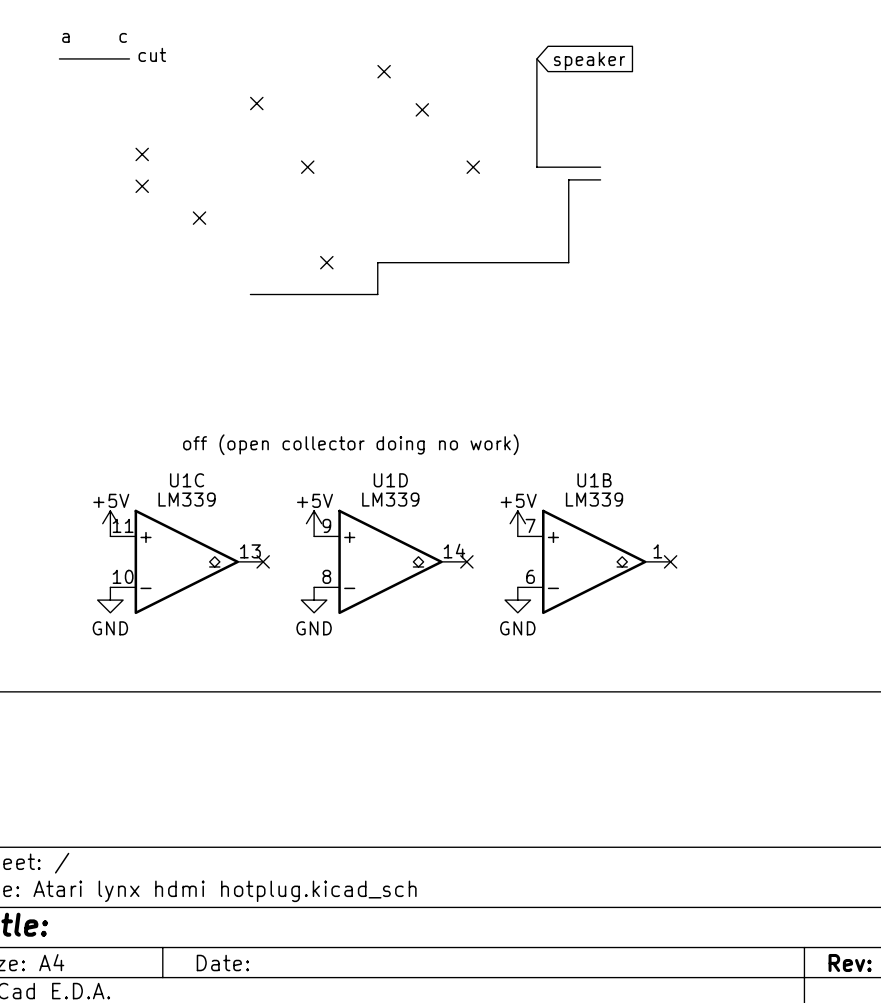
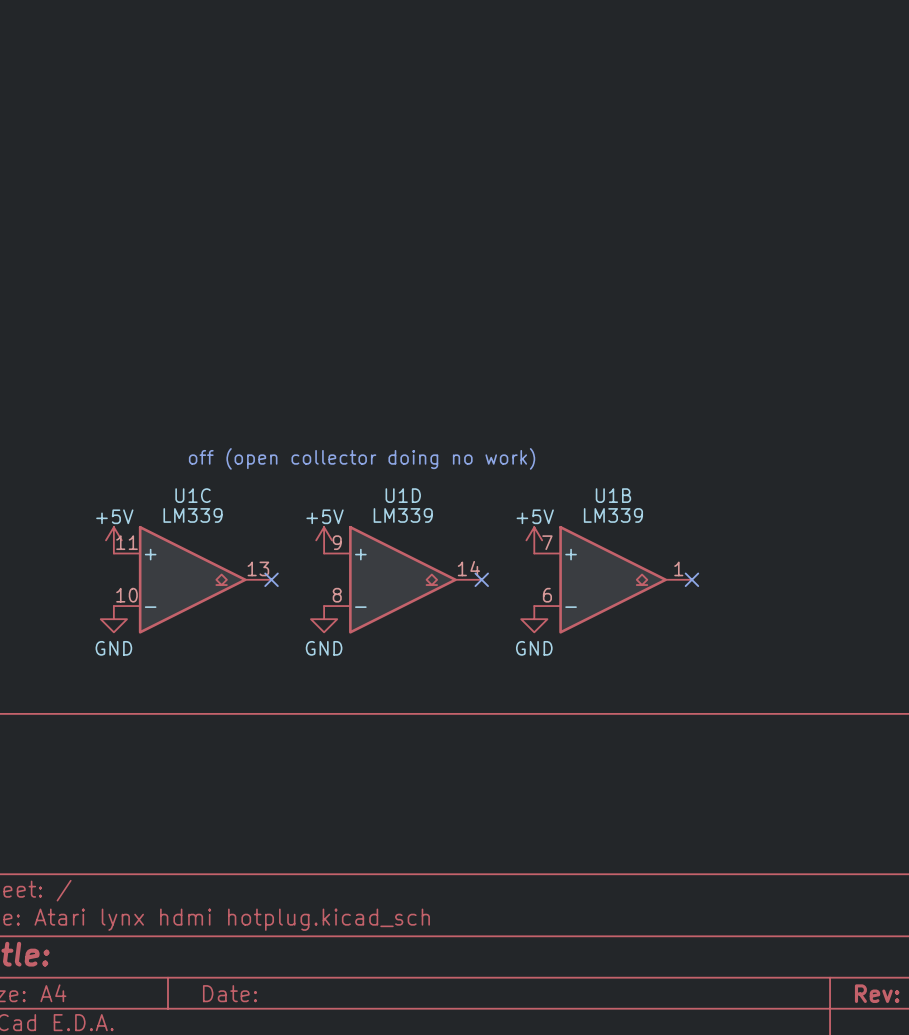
text: a (65, 37) -> none
text: c (123, 37) -> none
text: cut (152, 54) -> none
line: (59, 58) (129, 58) -> none
wire: (536, 58) (536, 167) (600, 167) -> none
global label: speaker (589, 61) -> none
no-connect mark: (384, 71) -> none
no-connect mark: (256, 103) -> none
no-connect mark: (422, 109) -> none
no-connect mark: (142, 154) -> none
no-connect mark: (307, 167) -> none
no-connect mark: (473, 167) -> none
wire: (600, 179) (568, 179) (568, 262) (377, 262) (377, 294) (250, 294) -> none
no-connect mark: (142, 186) -> none
no-connect mark: (199, 218) -> none
no-connect mark: (326, 262) -> none

